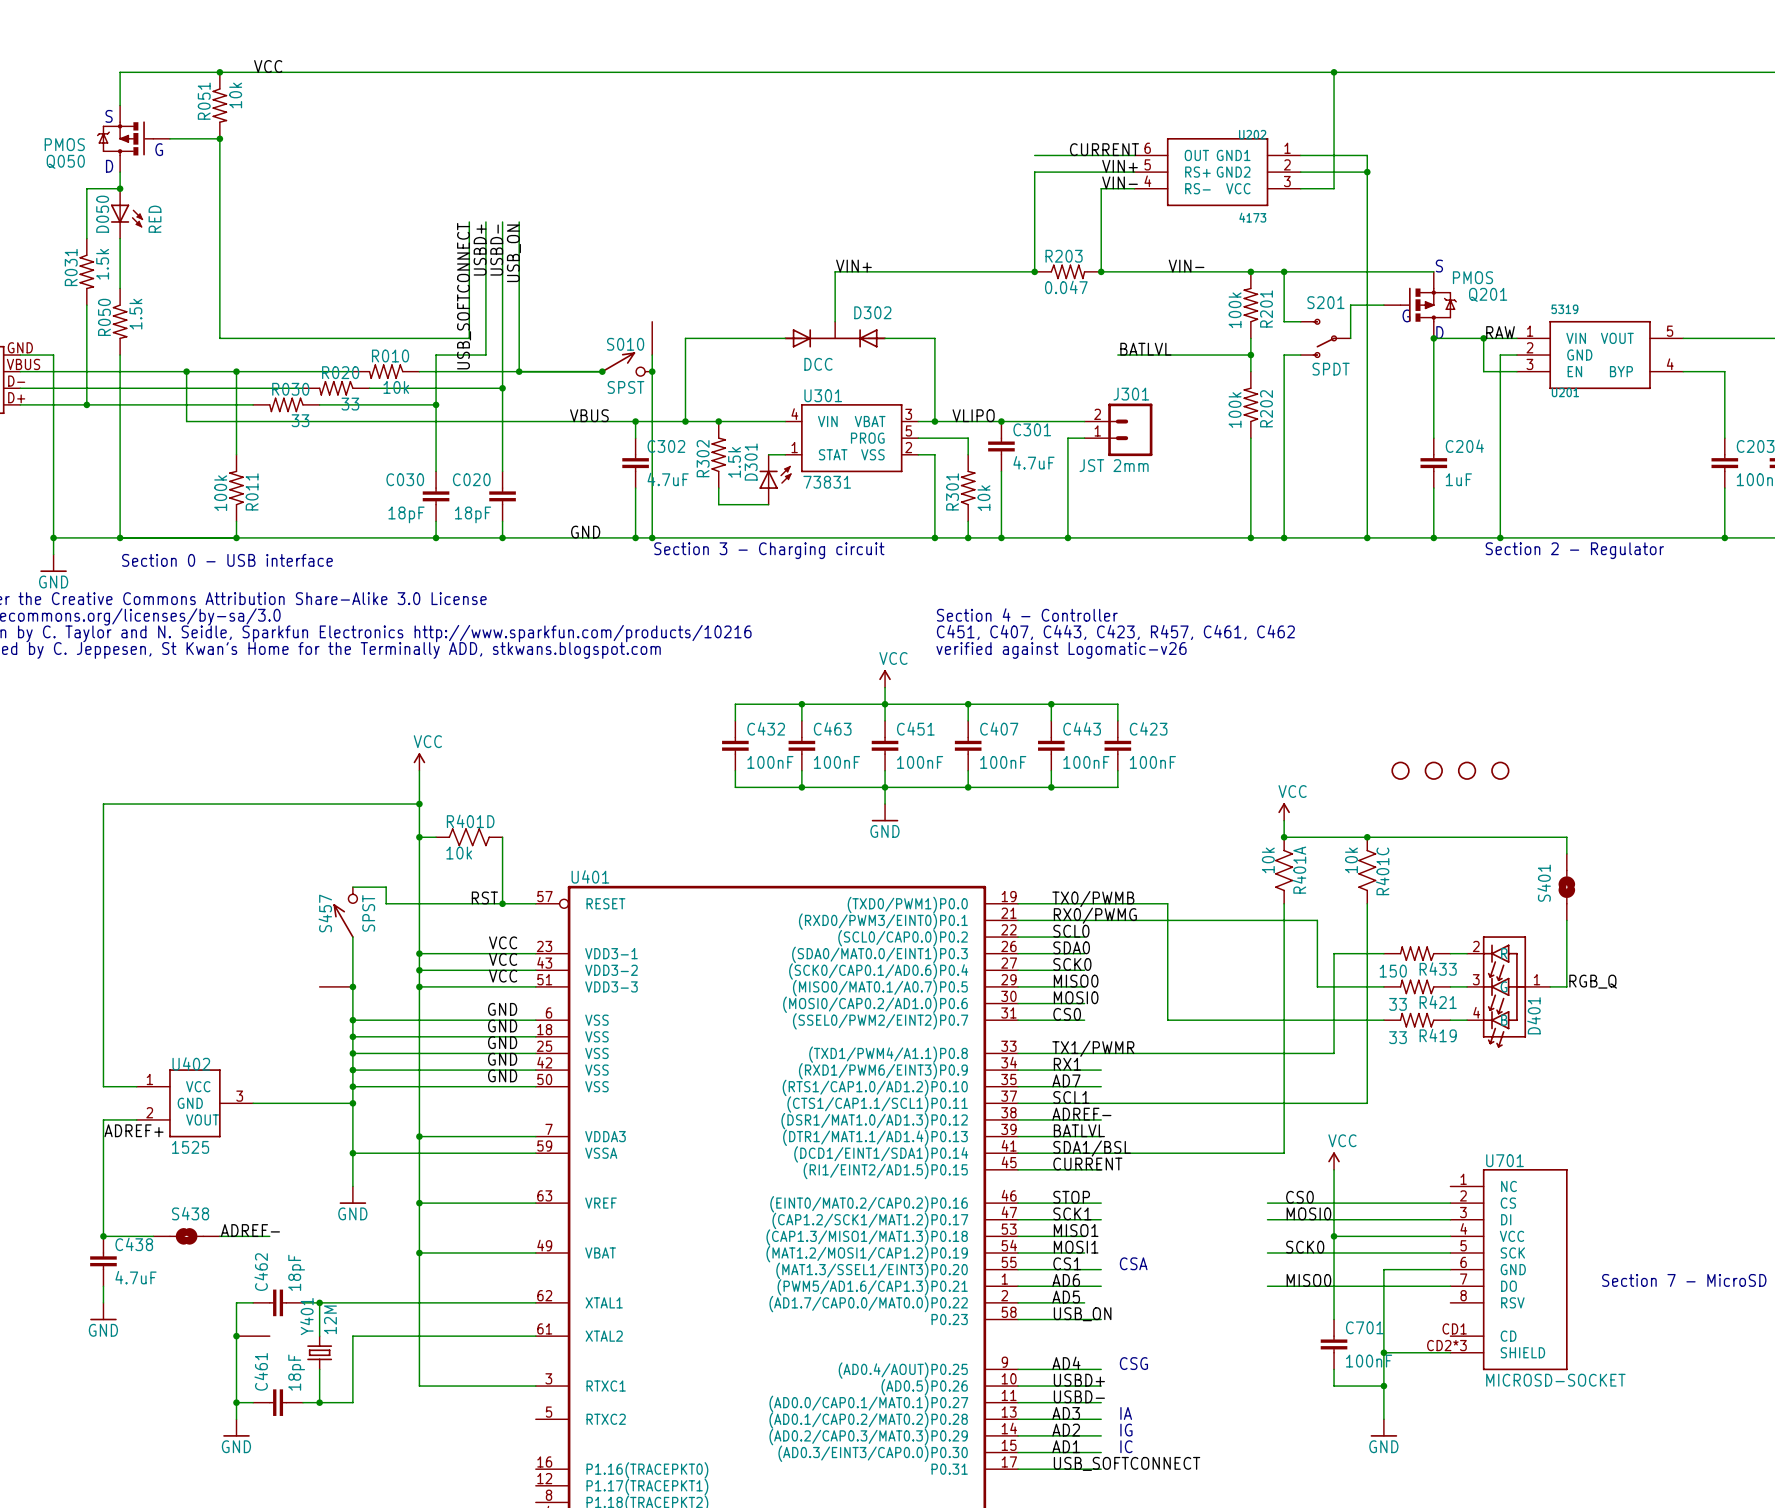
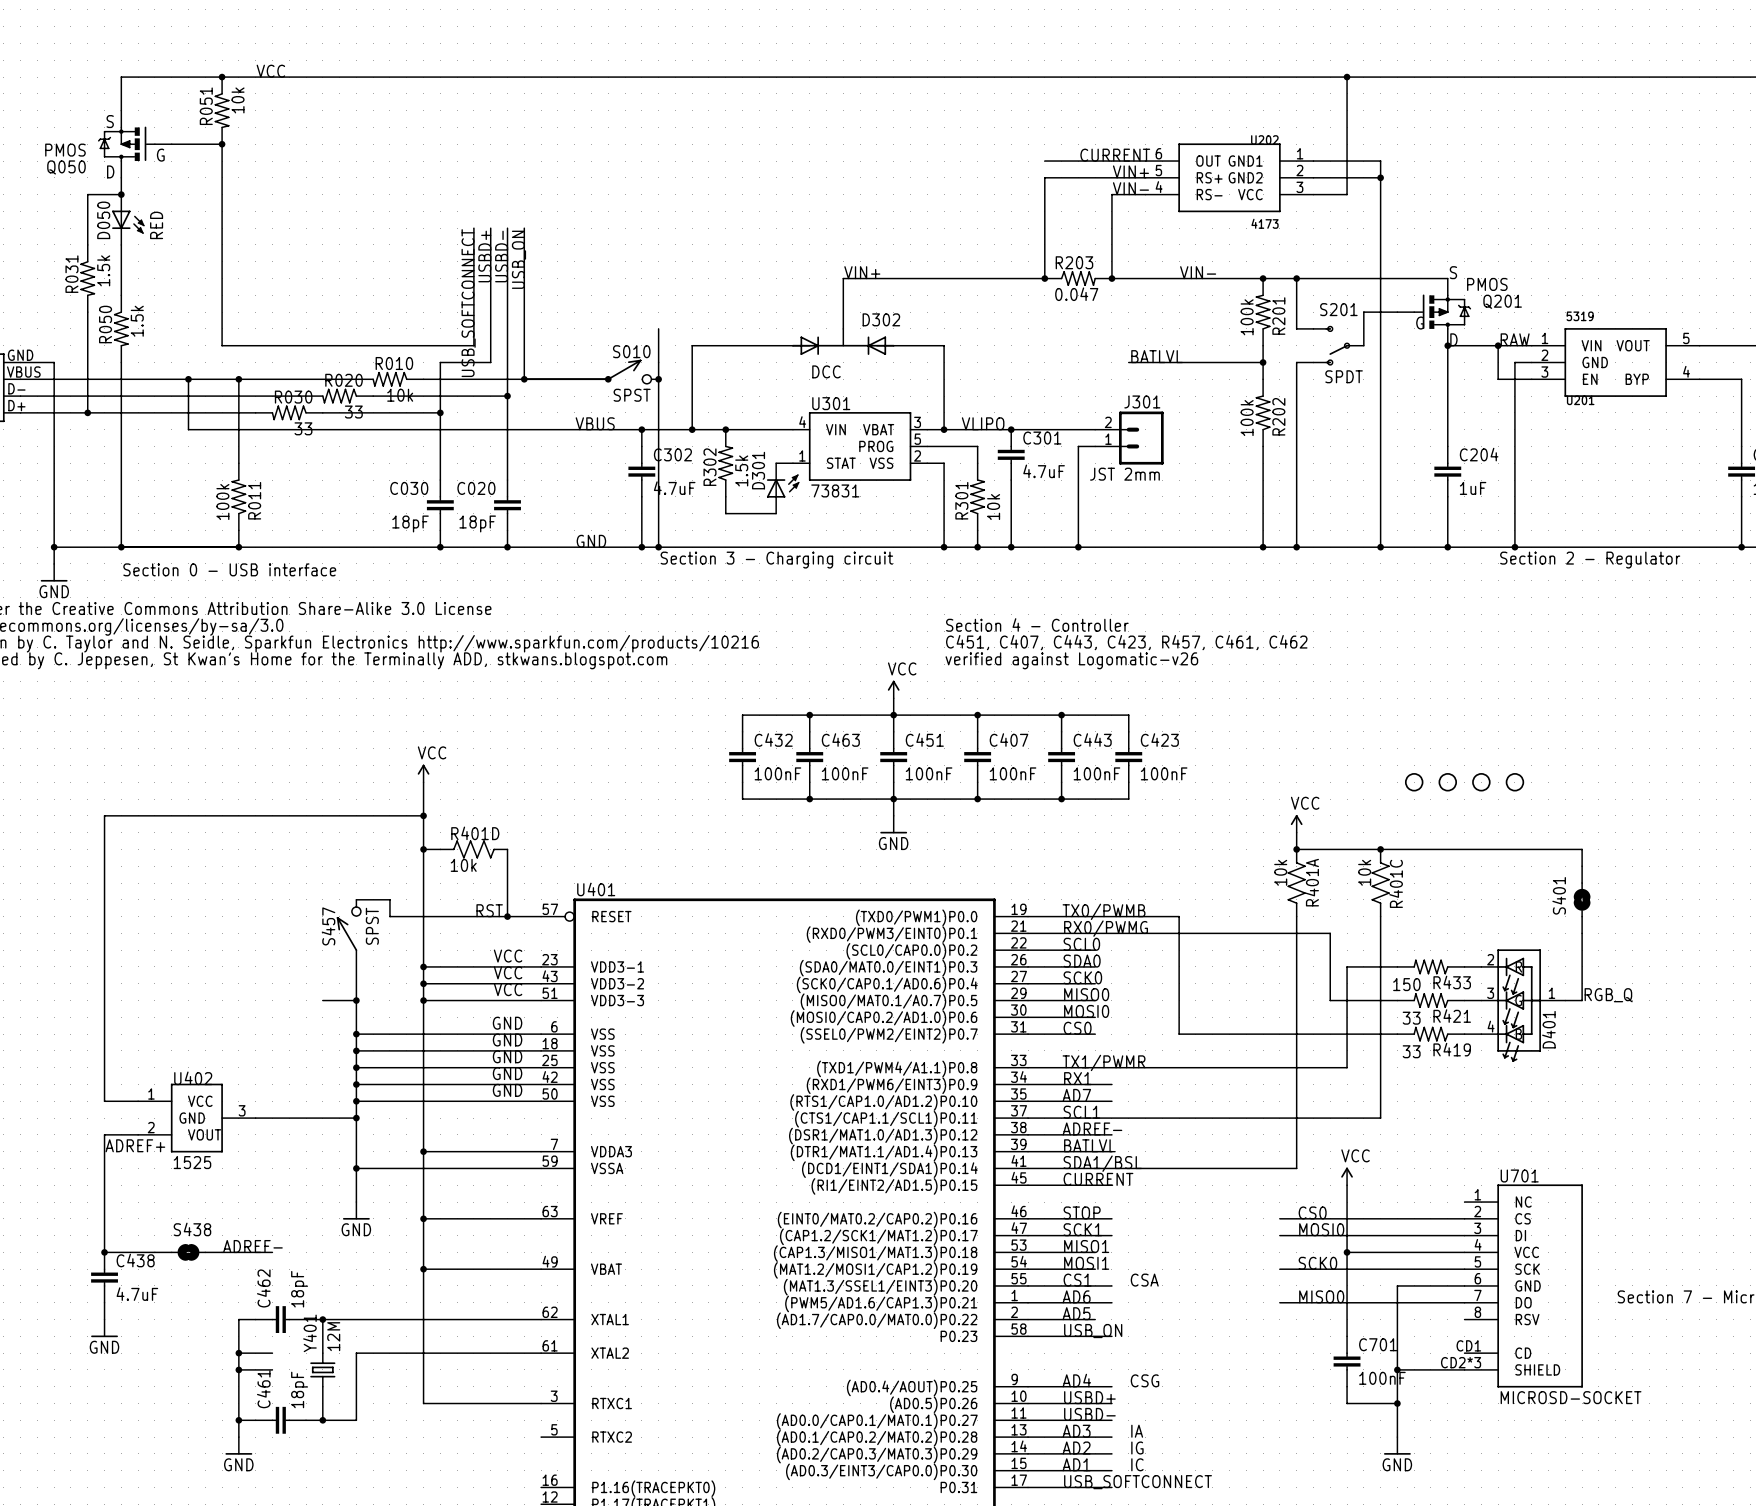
junction: none -> (238, 1369)
part: none -> (255, 1369)

